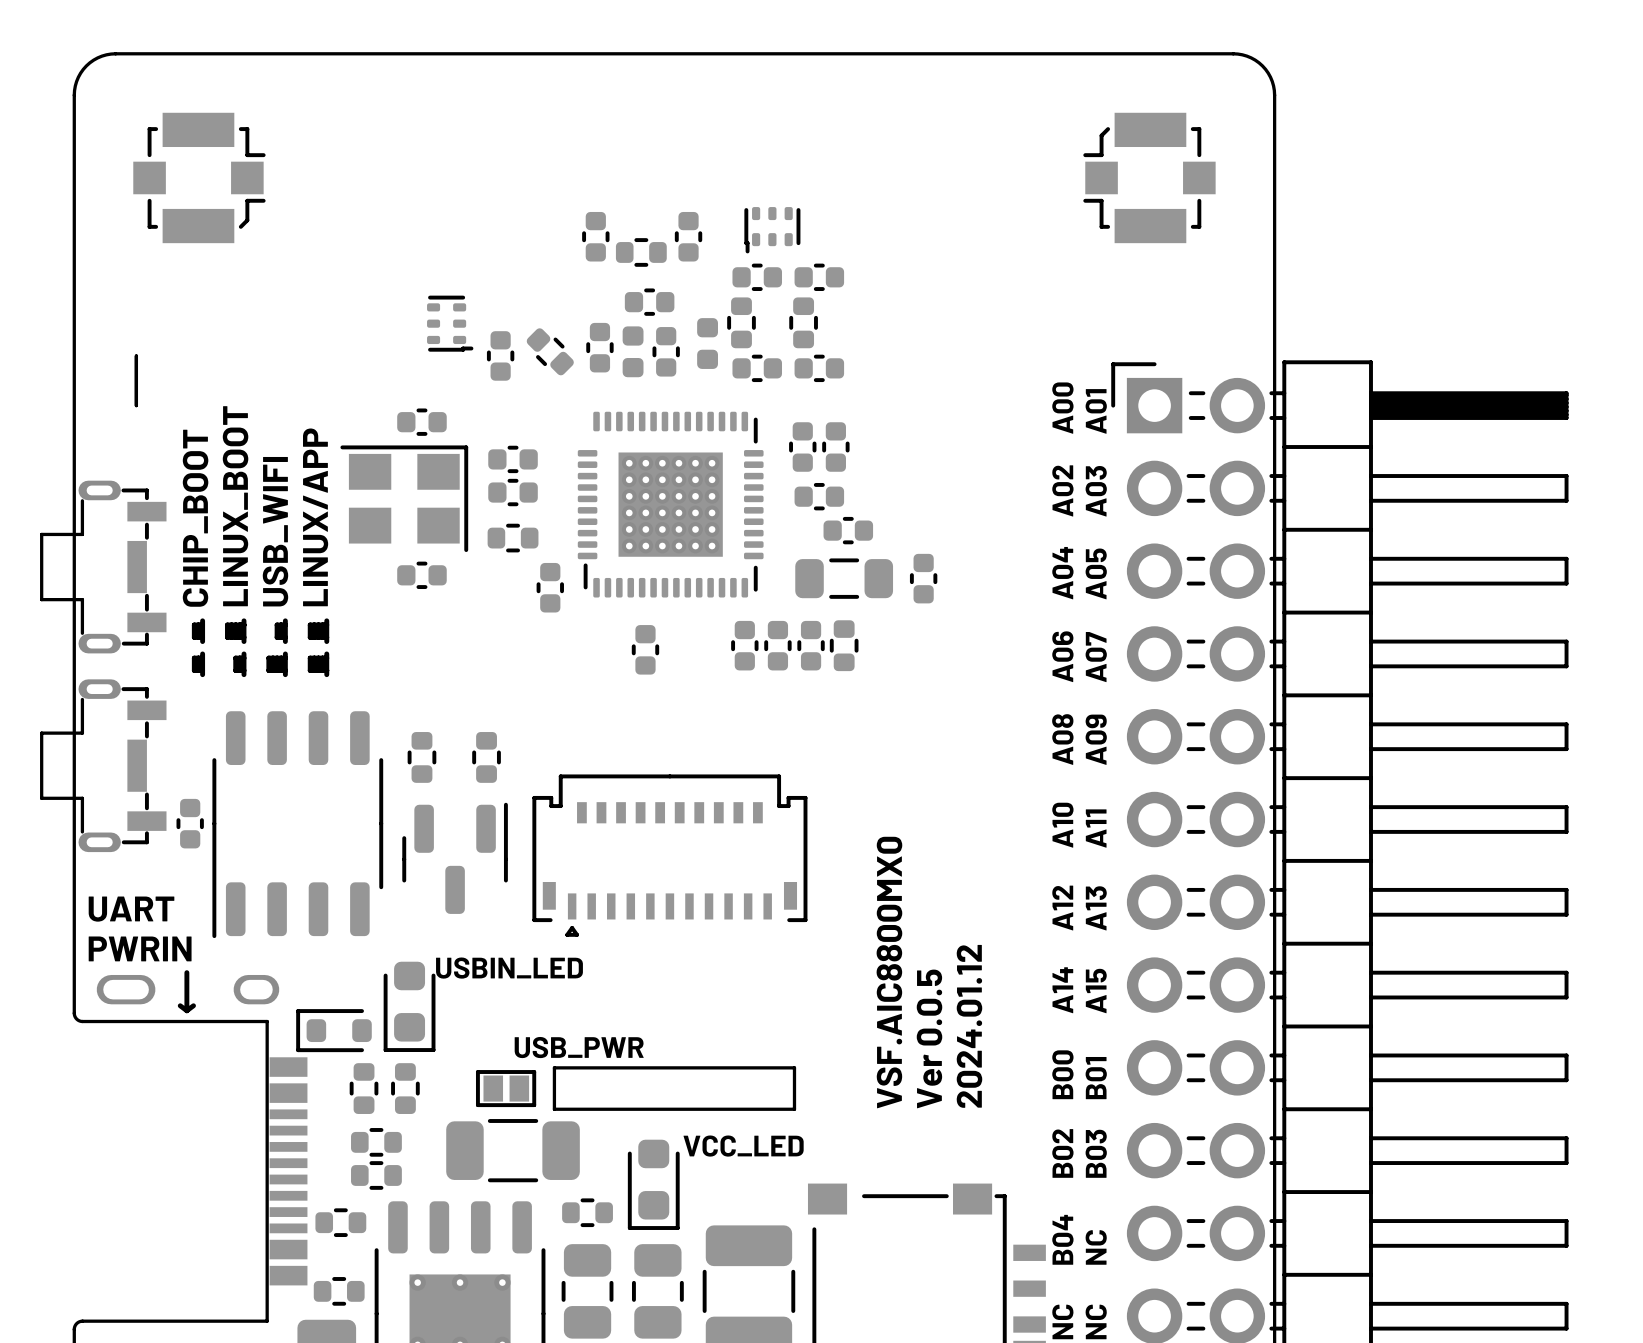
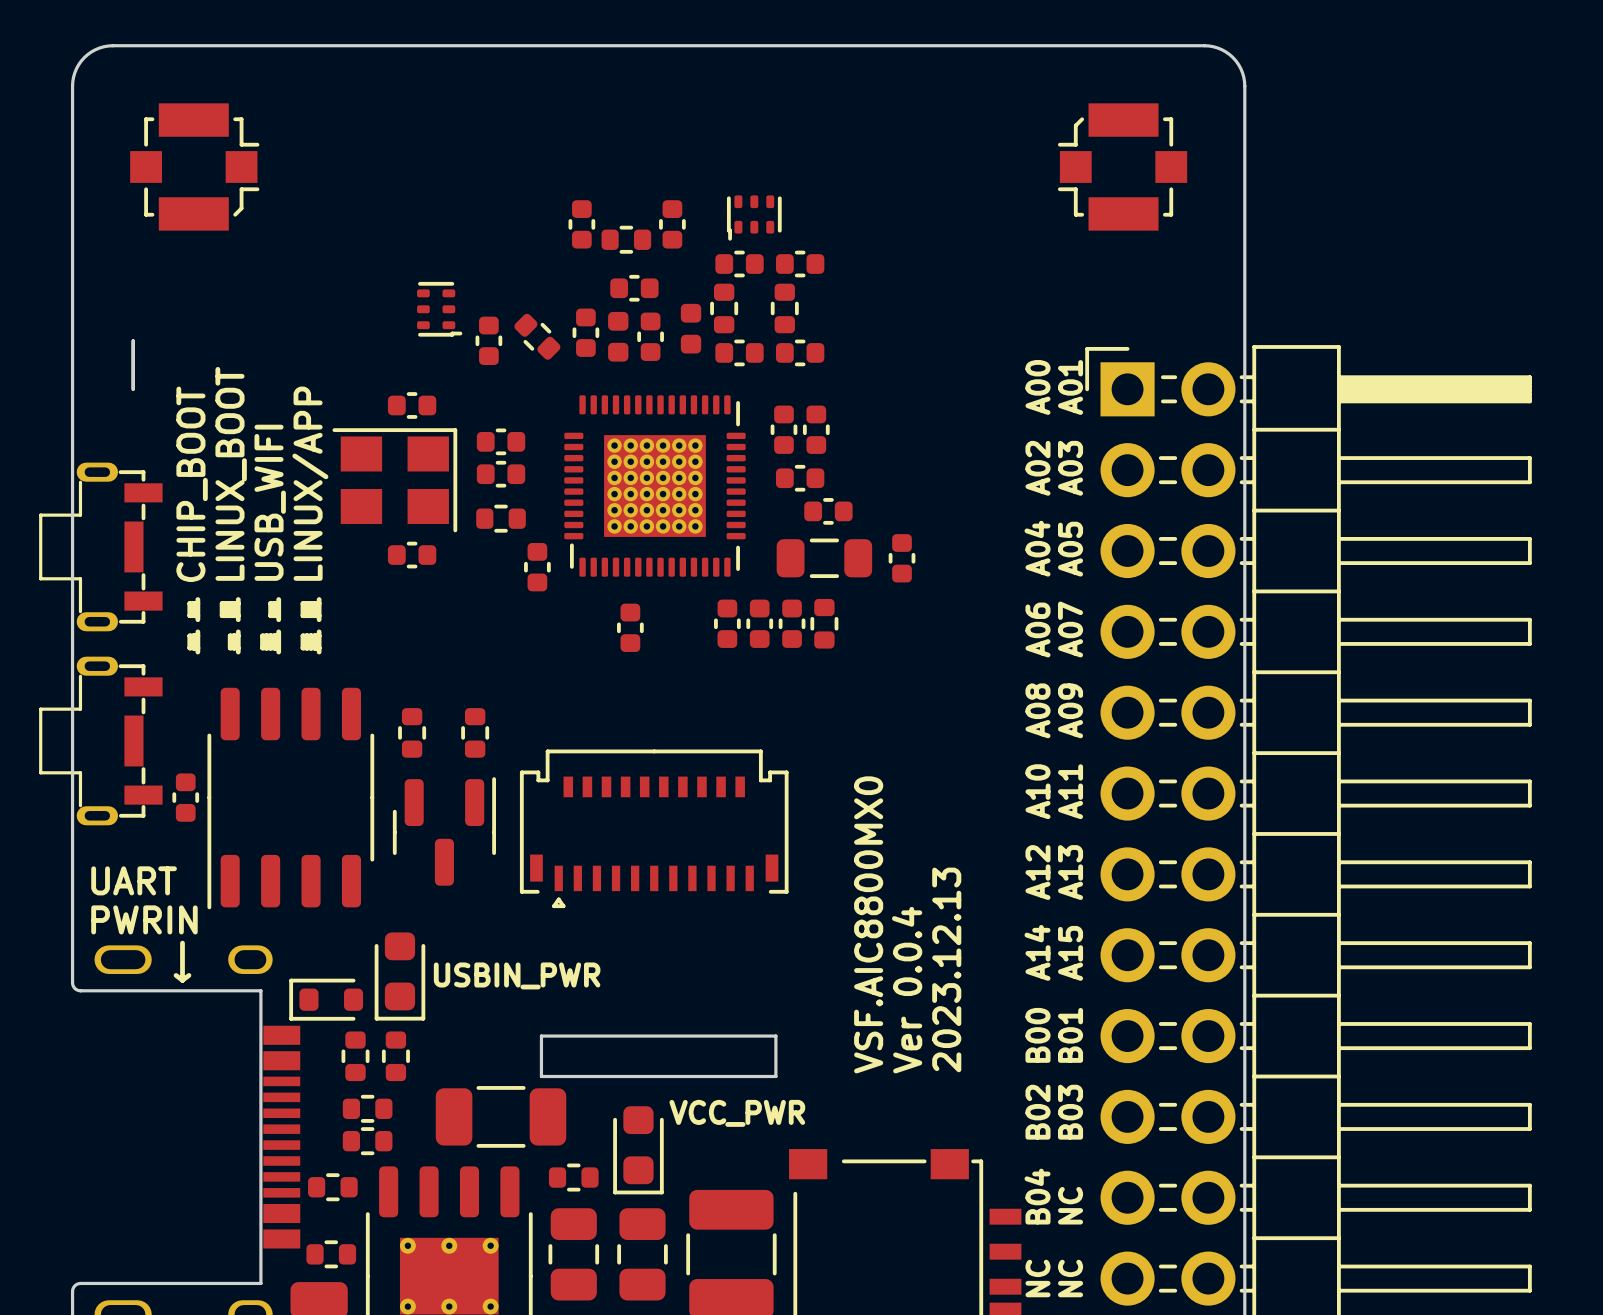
text: USBIN_LED (509, 968) -> USBIN_PWR (517, 975)
text: 2024.01.12 (969, 1026) -> 2023.12.13 (946, 969)
text: Ver 0.0.5 (929, 1038) -> Ver 0.0.4 (907, 990)
text: USB_PWR (579, 1047) -> none
part: (506, 1088) -> none
text: VCC_LED (743, 1146) -> VCC_PWR (737, 1113)

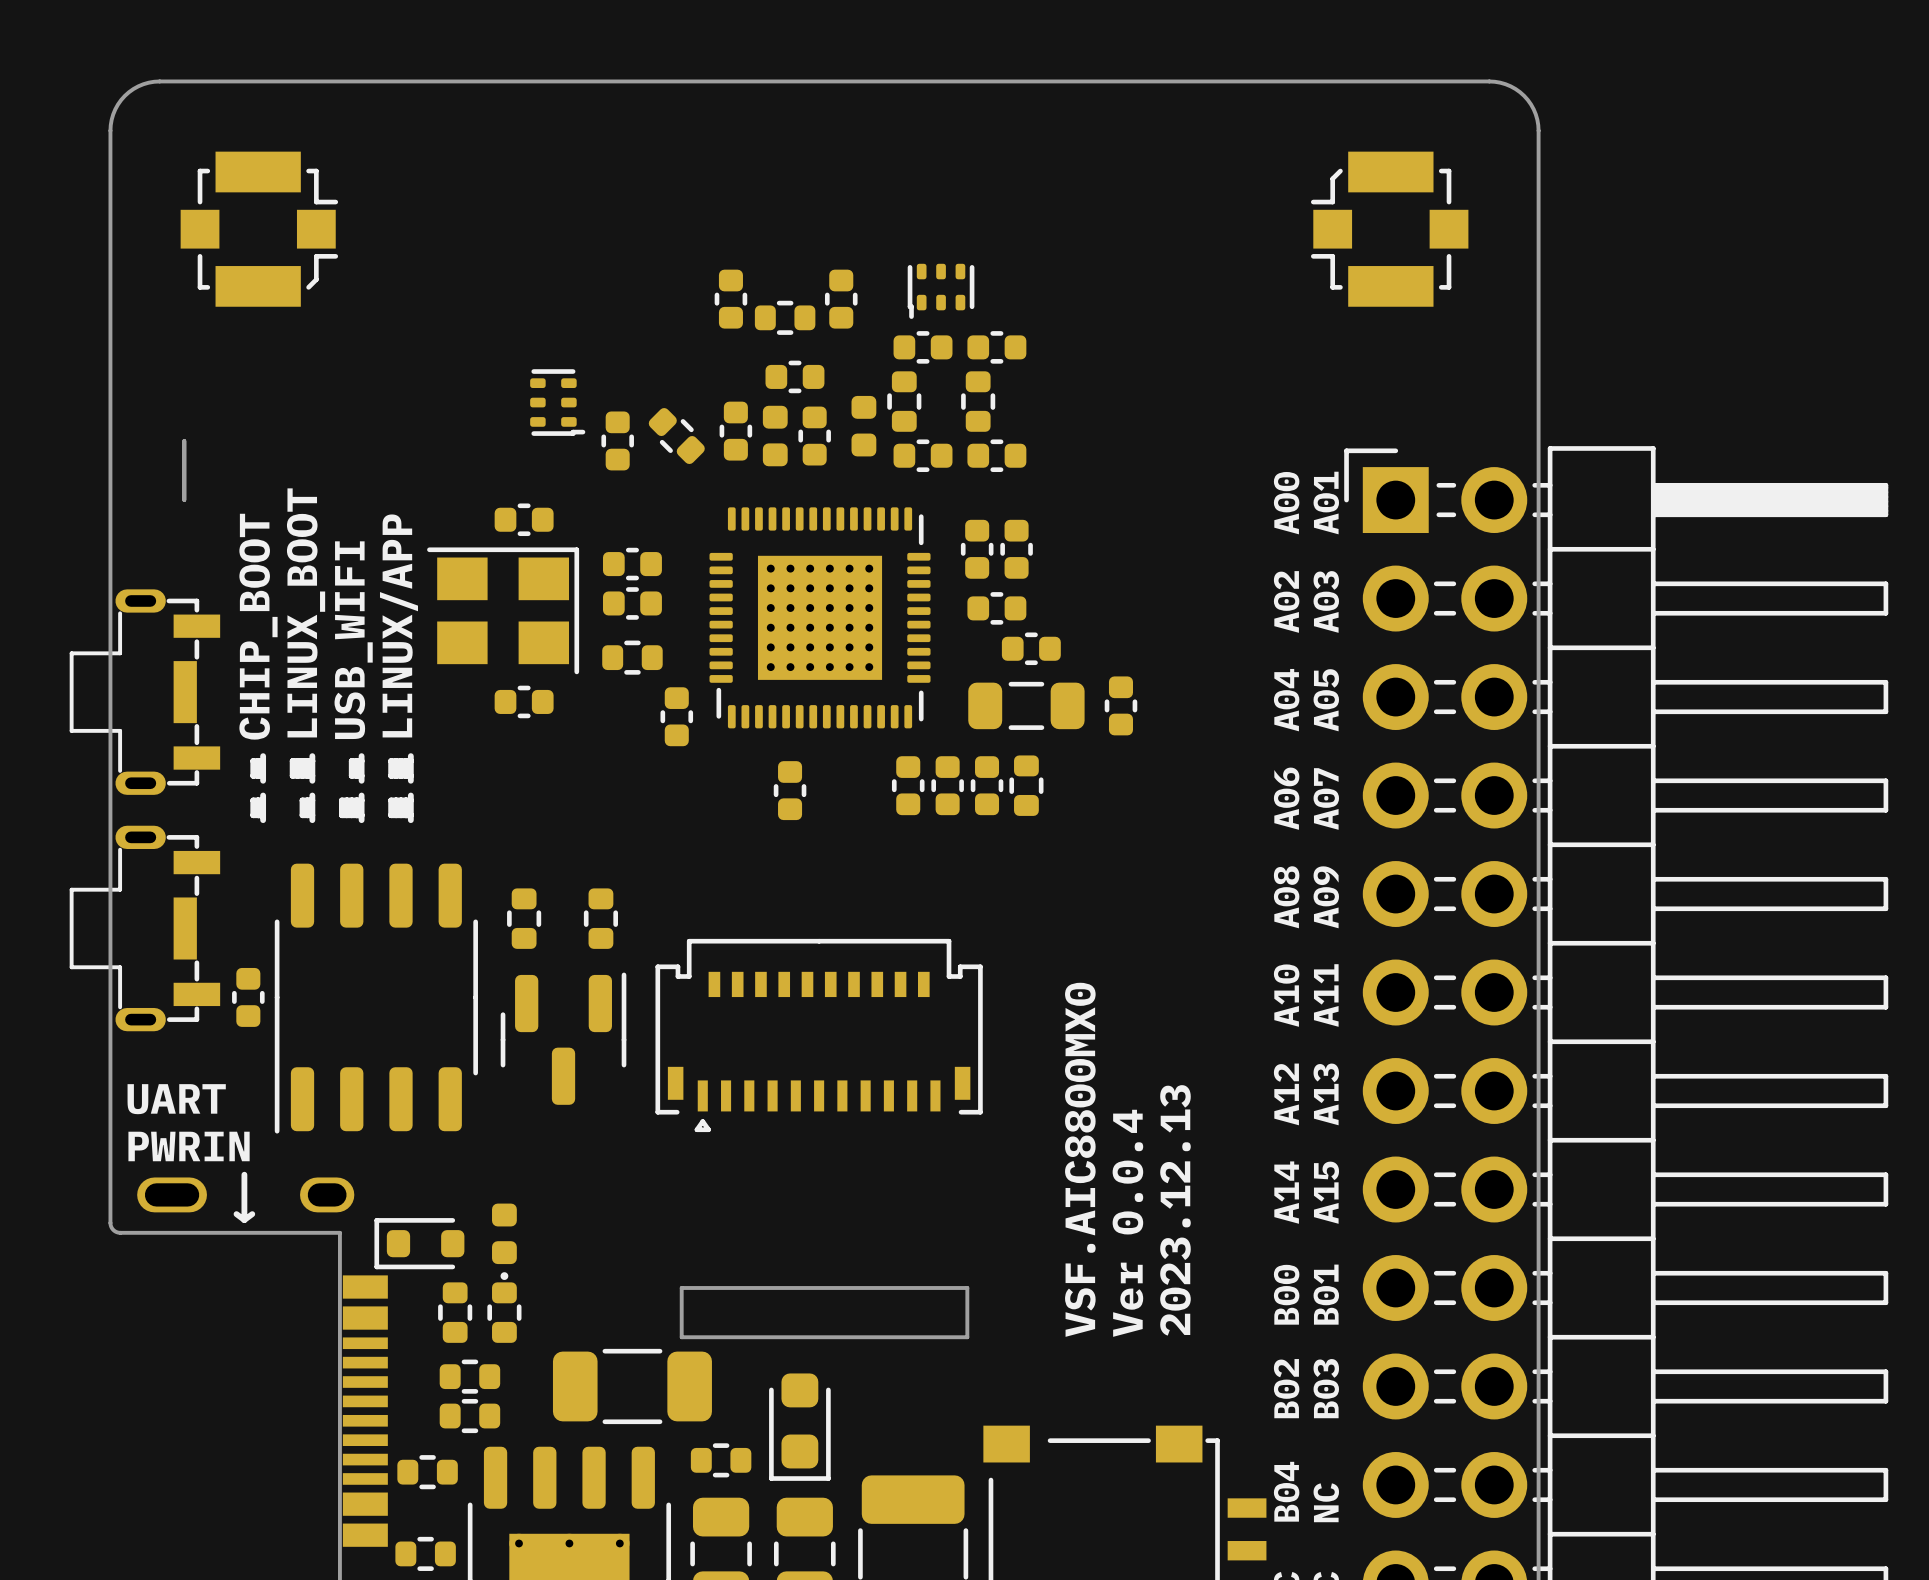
part footprint: [374, 932, 426, 1021] -> [492, 1203, 517, 1280]
text: USBIN_PWR (517, 975) -> none
text: VCC_PWR (737, 1113) -> none

